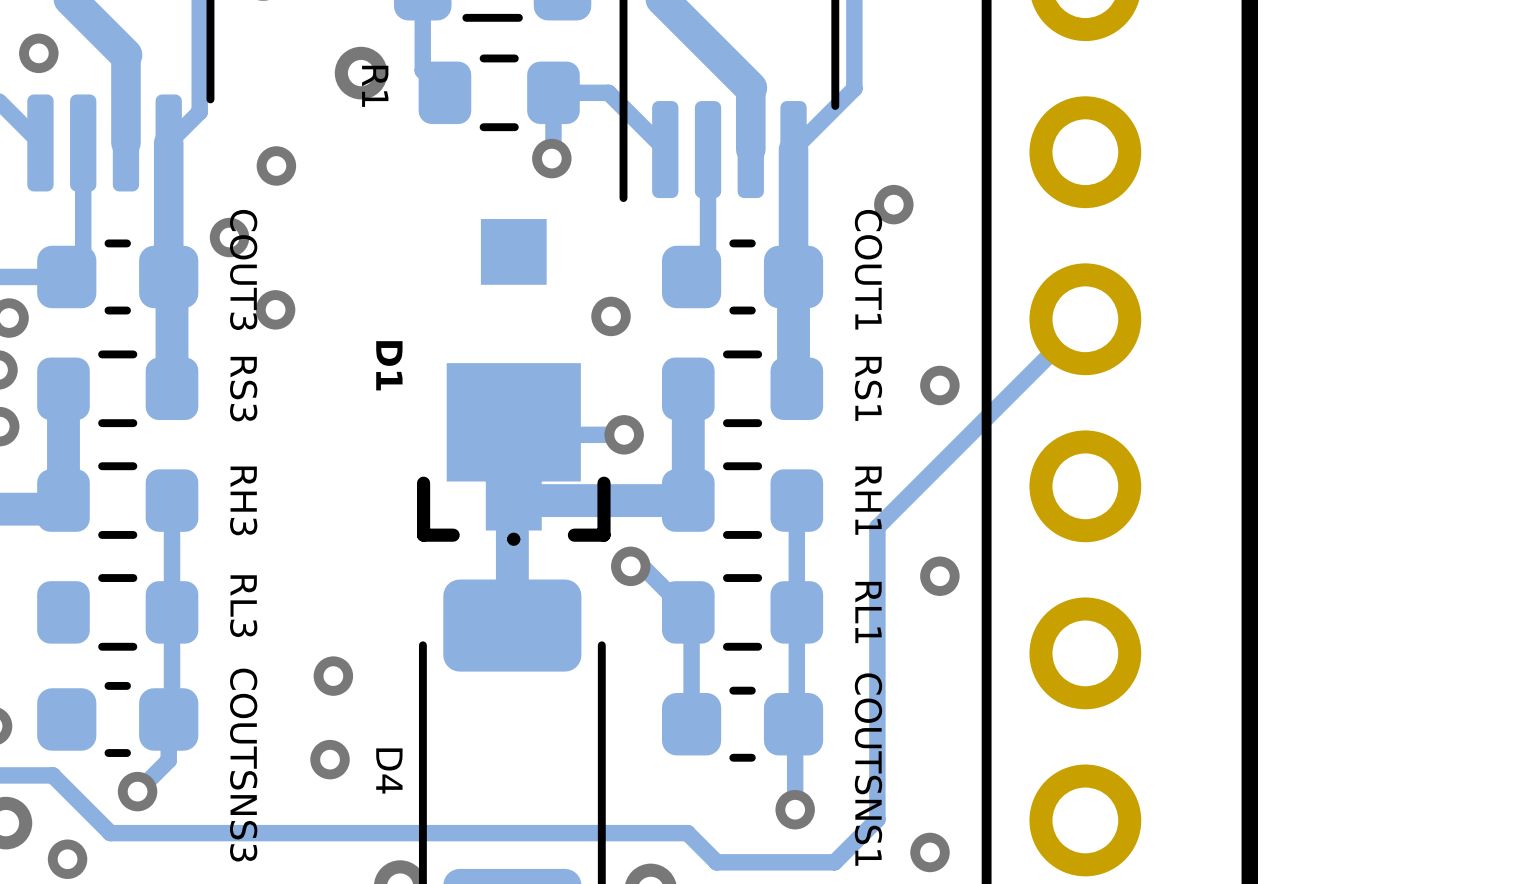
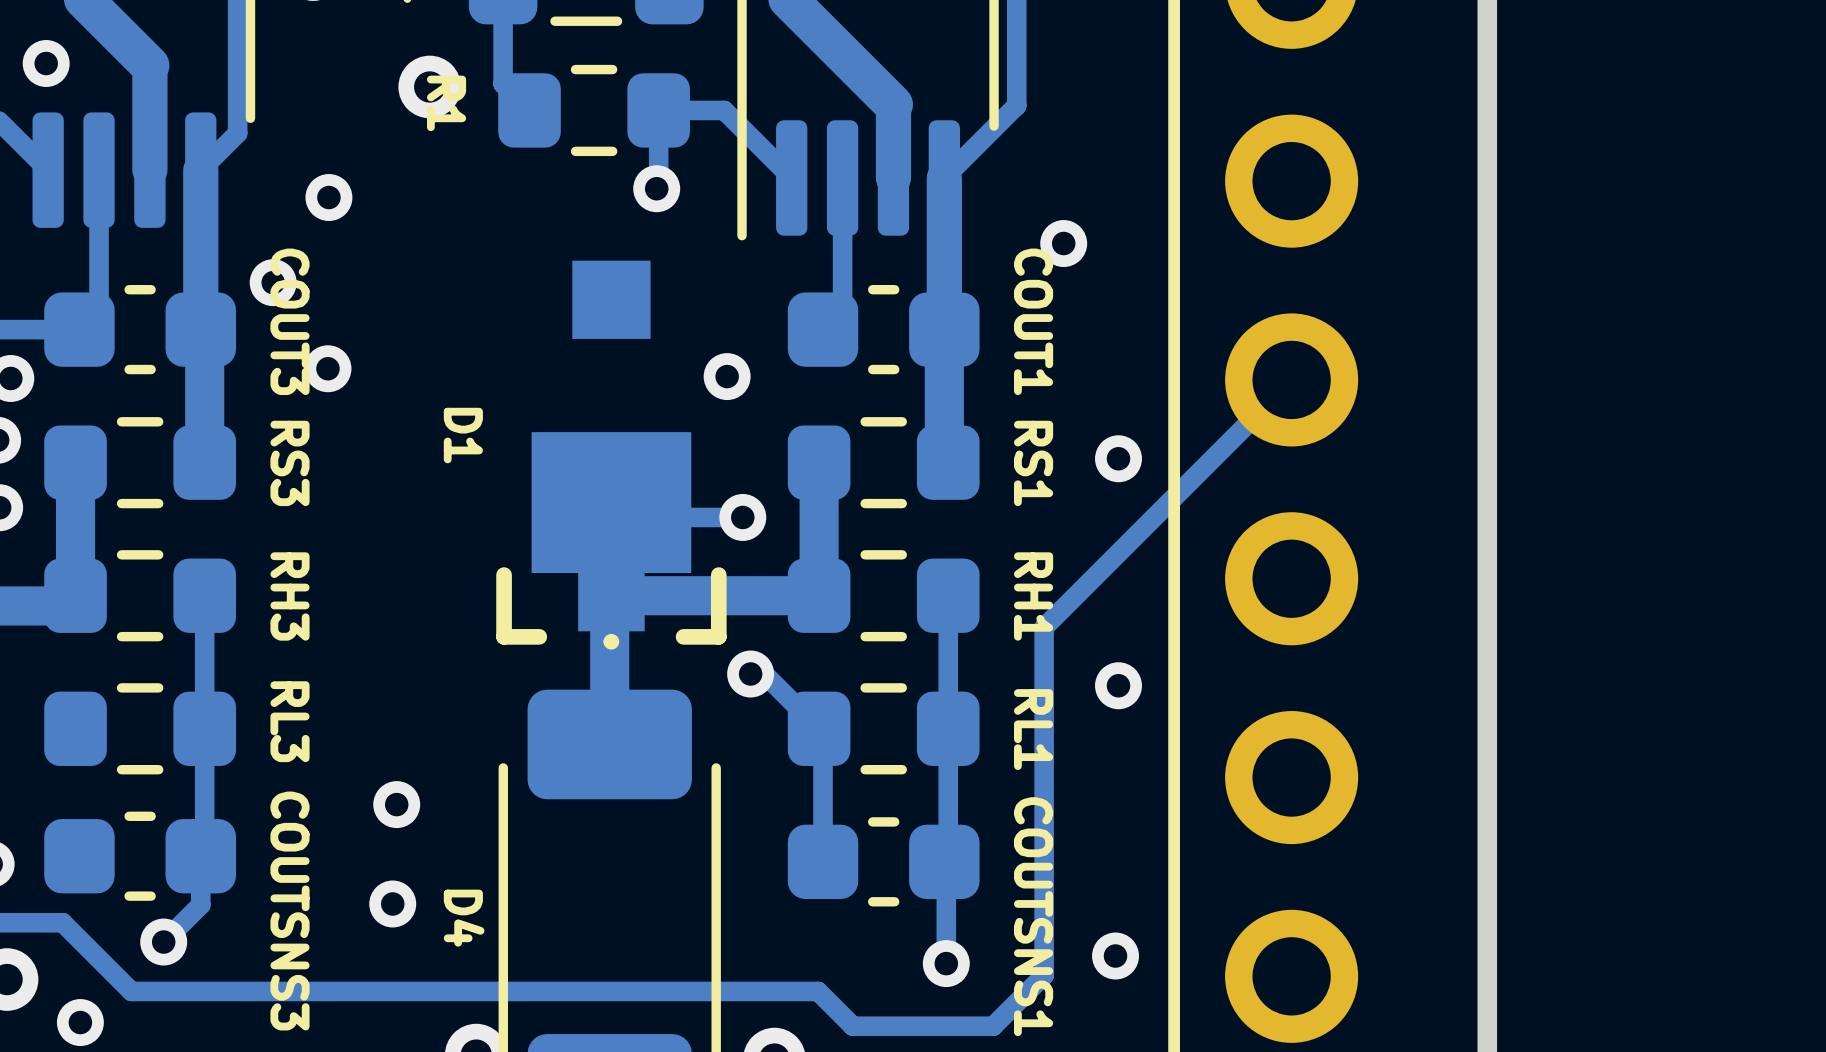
via: none -> (1115, 956)
via: (930, 852) -> none

